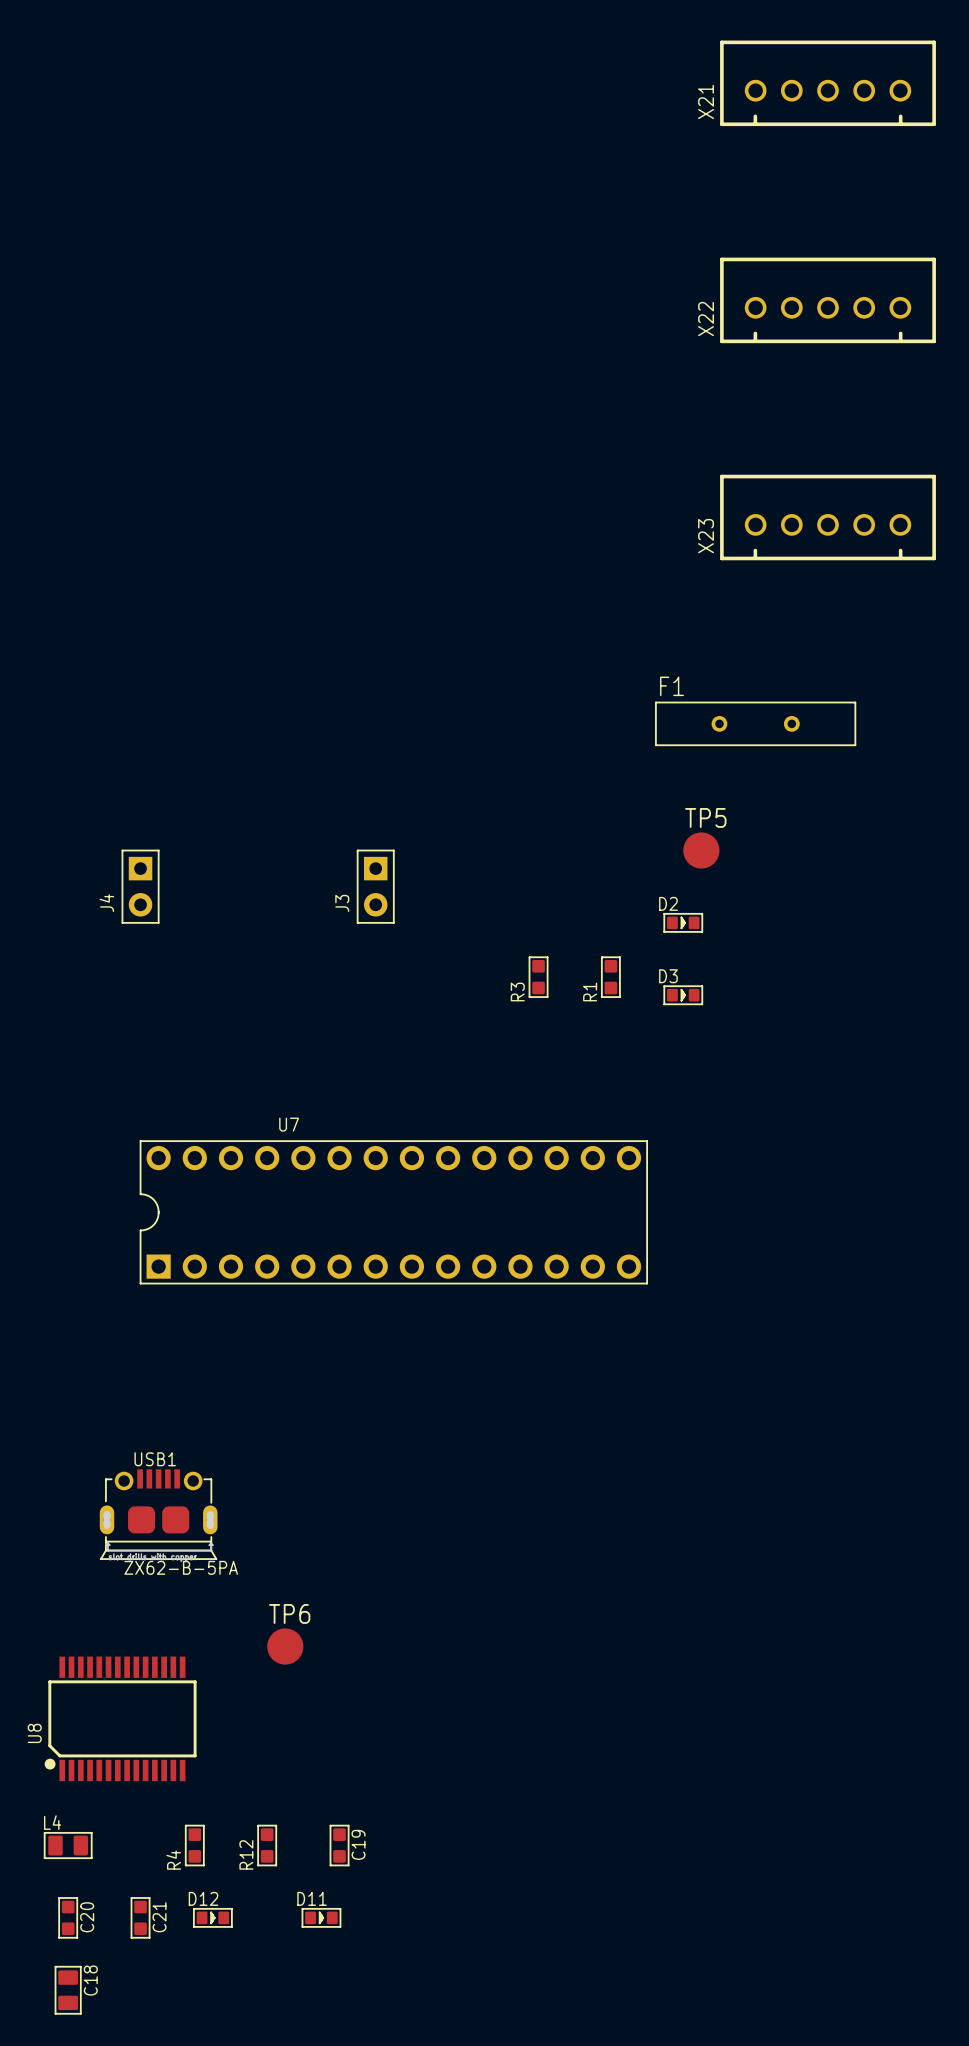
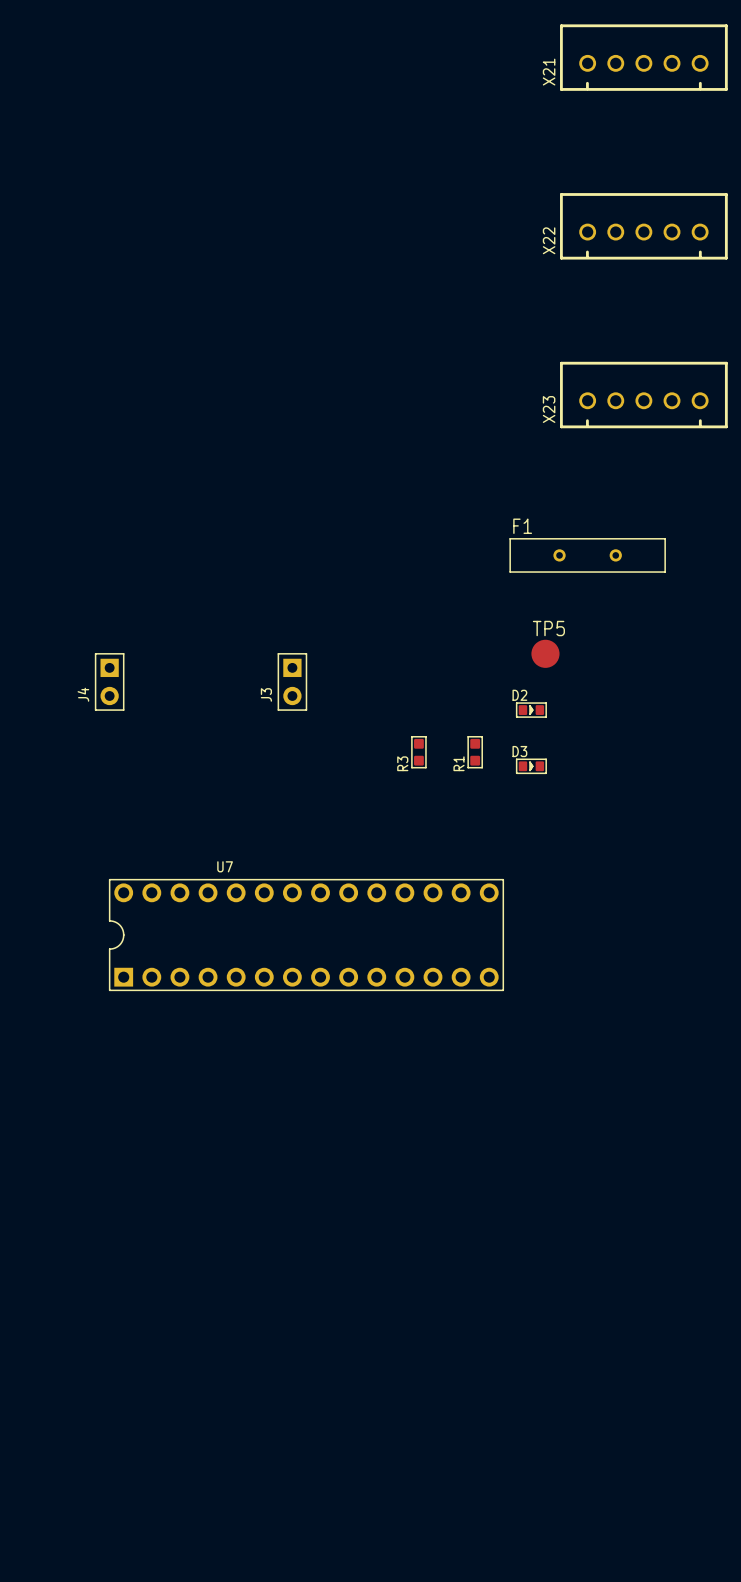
USB1: ZX62-B-5PA (158, 1514) -> none
TP6: (285, 1646) -> none
U8: (120, 1718) -> none
L4: (68, 1845) -> none
R4: (194, 1845) -> none
R12: (267, 1845) -> none
C19: (339, 1845) -> none
C20: (68, 1917) -> none
C21: (140, 1917) -> none
D12: (212, 1917) -> none
D11: (321, 1917) -> none
C18: (68, 1990) -> none

